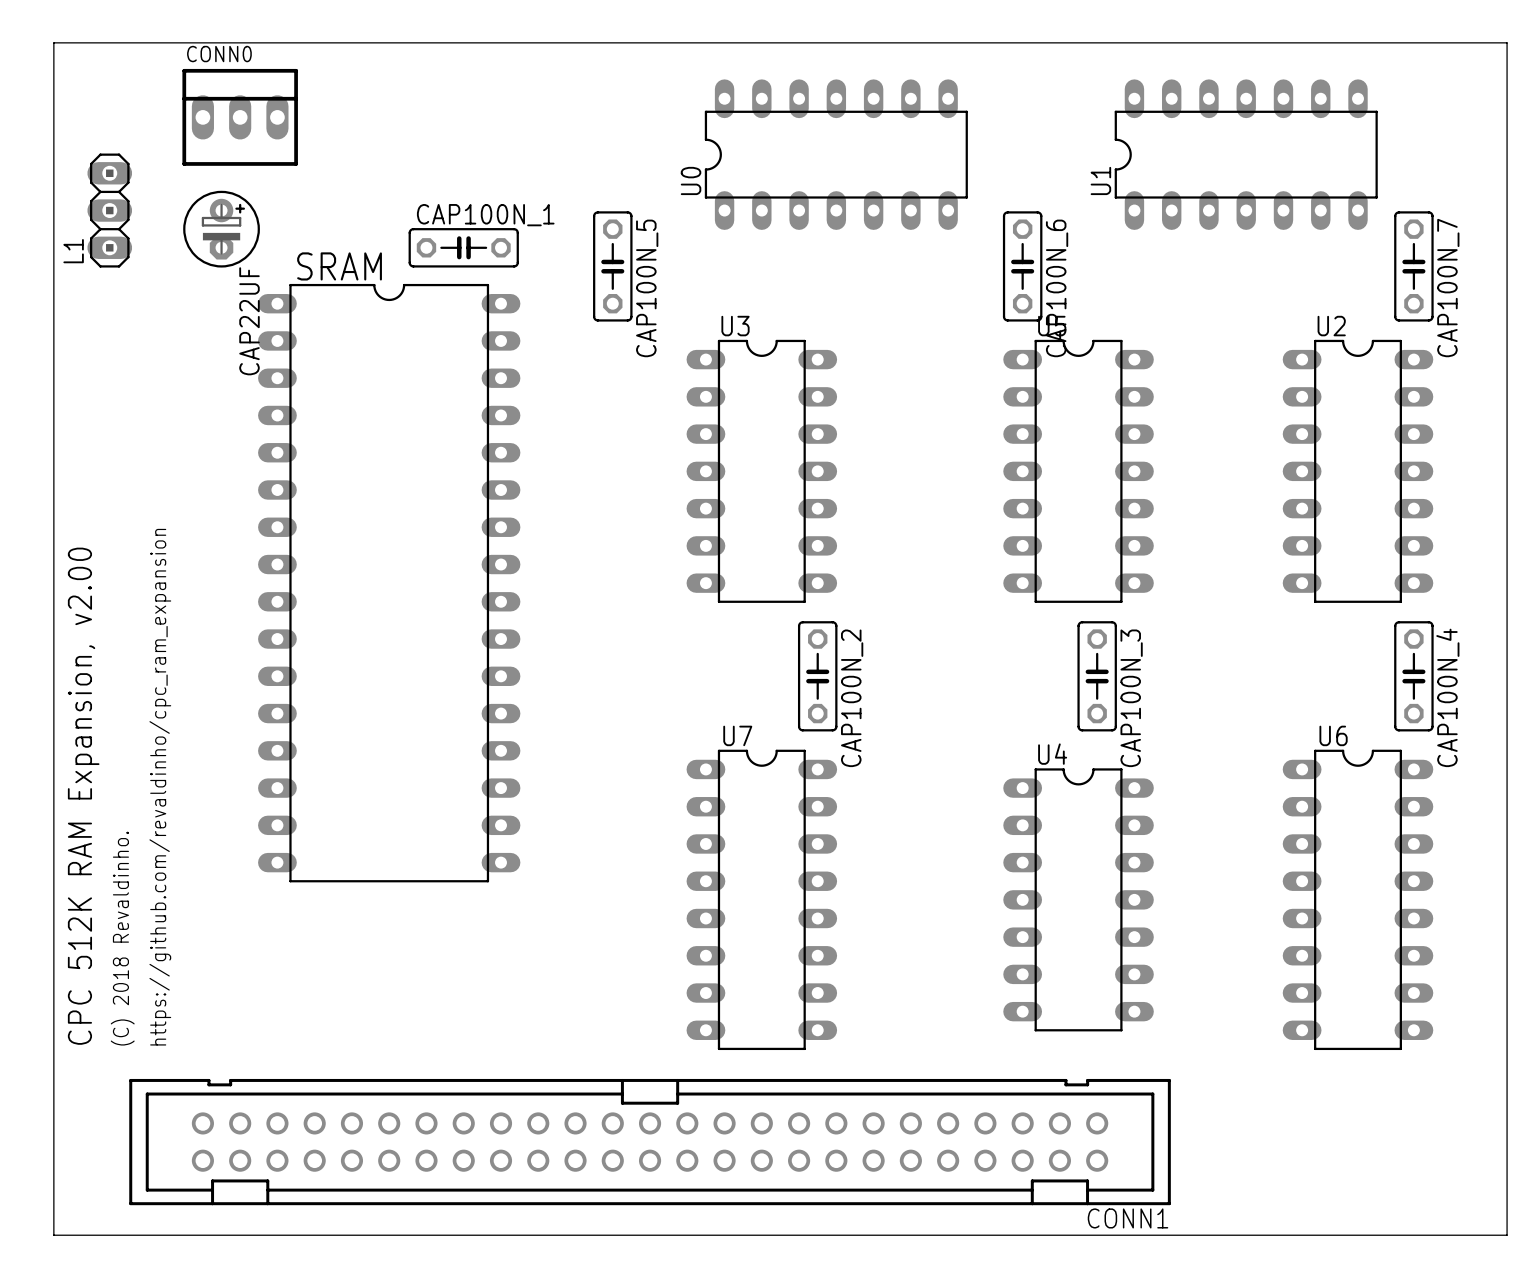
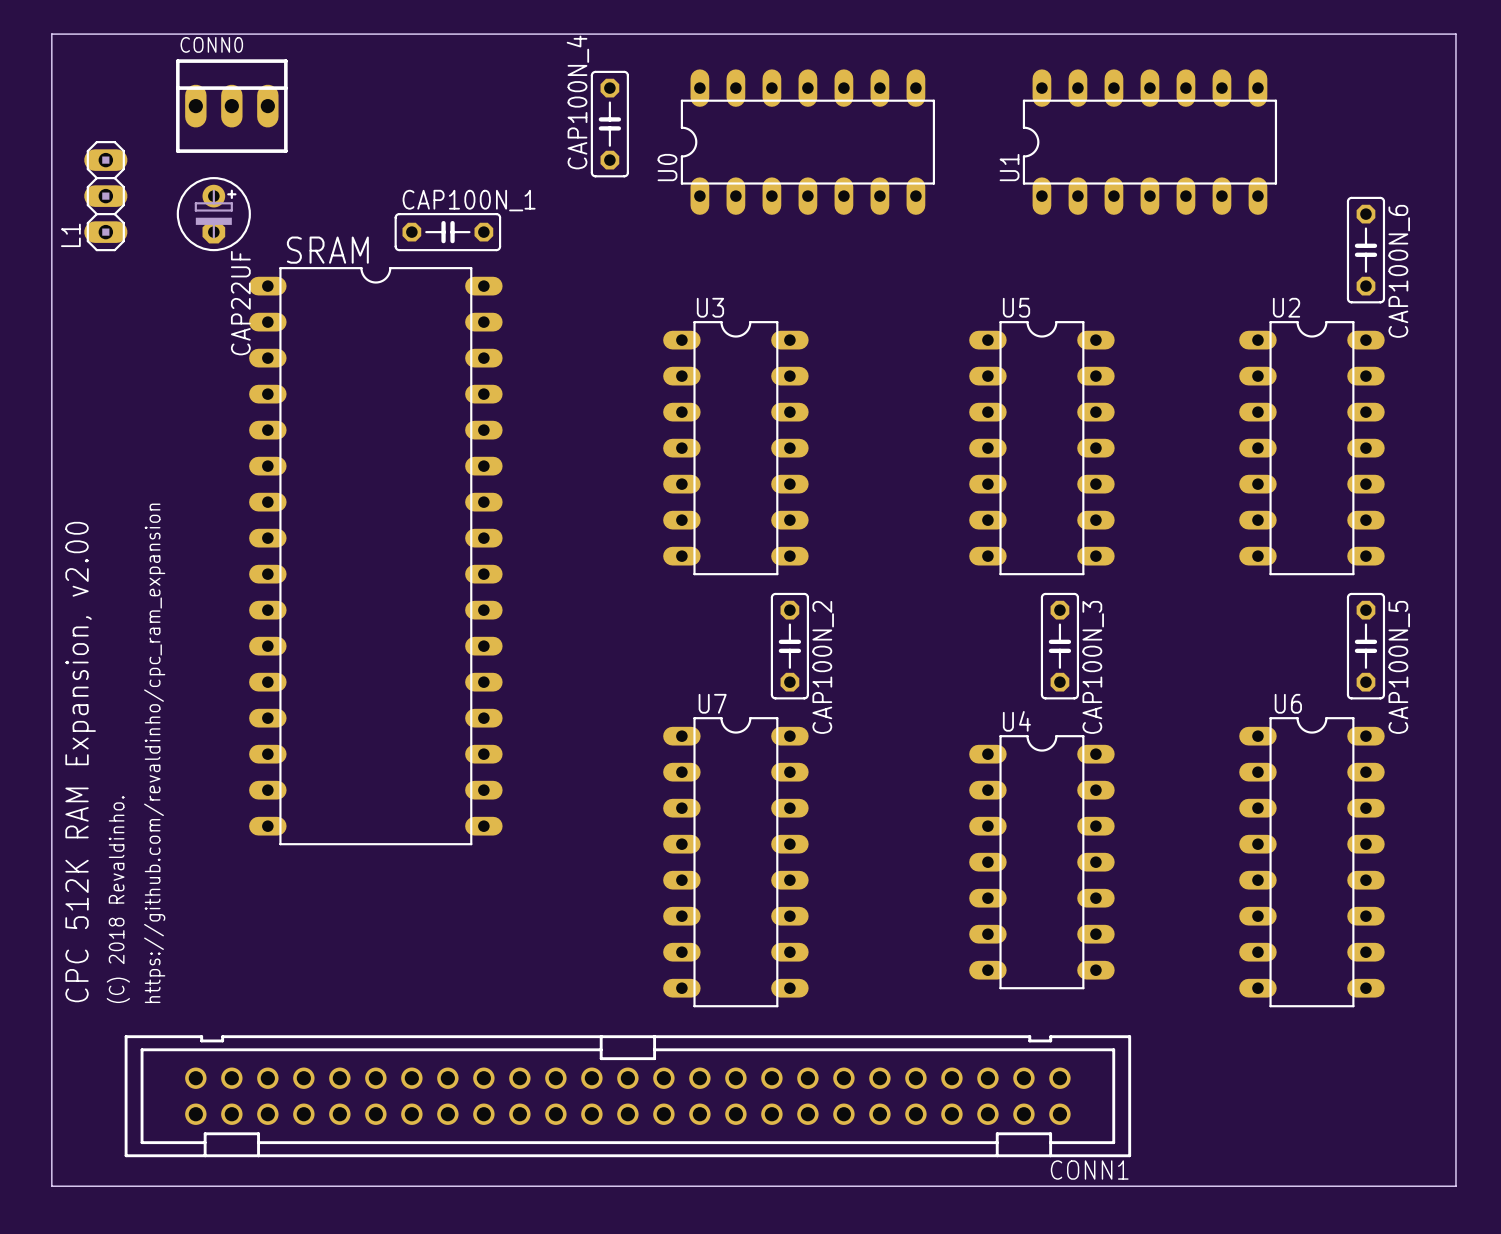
CAP100N_4: none -> (609, 124)
U1 position: (1246, 154) -> (1149, 142)
CAP100N_5: (612, 266) -> none
CAP100N_6: (1022, 266) -> none
CAP100N_7 name: CAP100N_7 (1448, 288) -> CAP100N_6 (1399, 271)
CAP100N_4 name: CAP100N_4 (1447, 697) -> CAP100N_5 (1399, 667)

